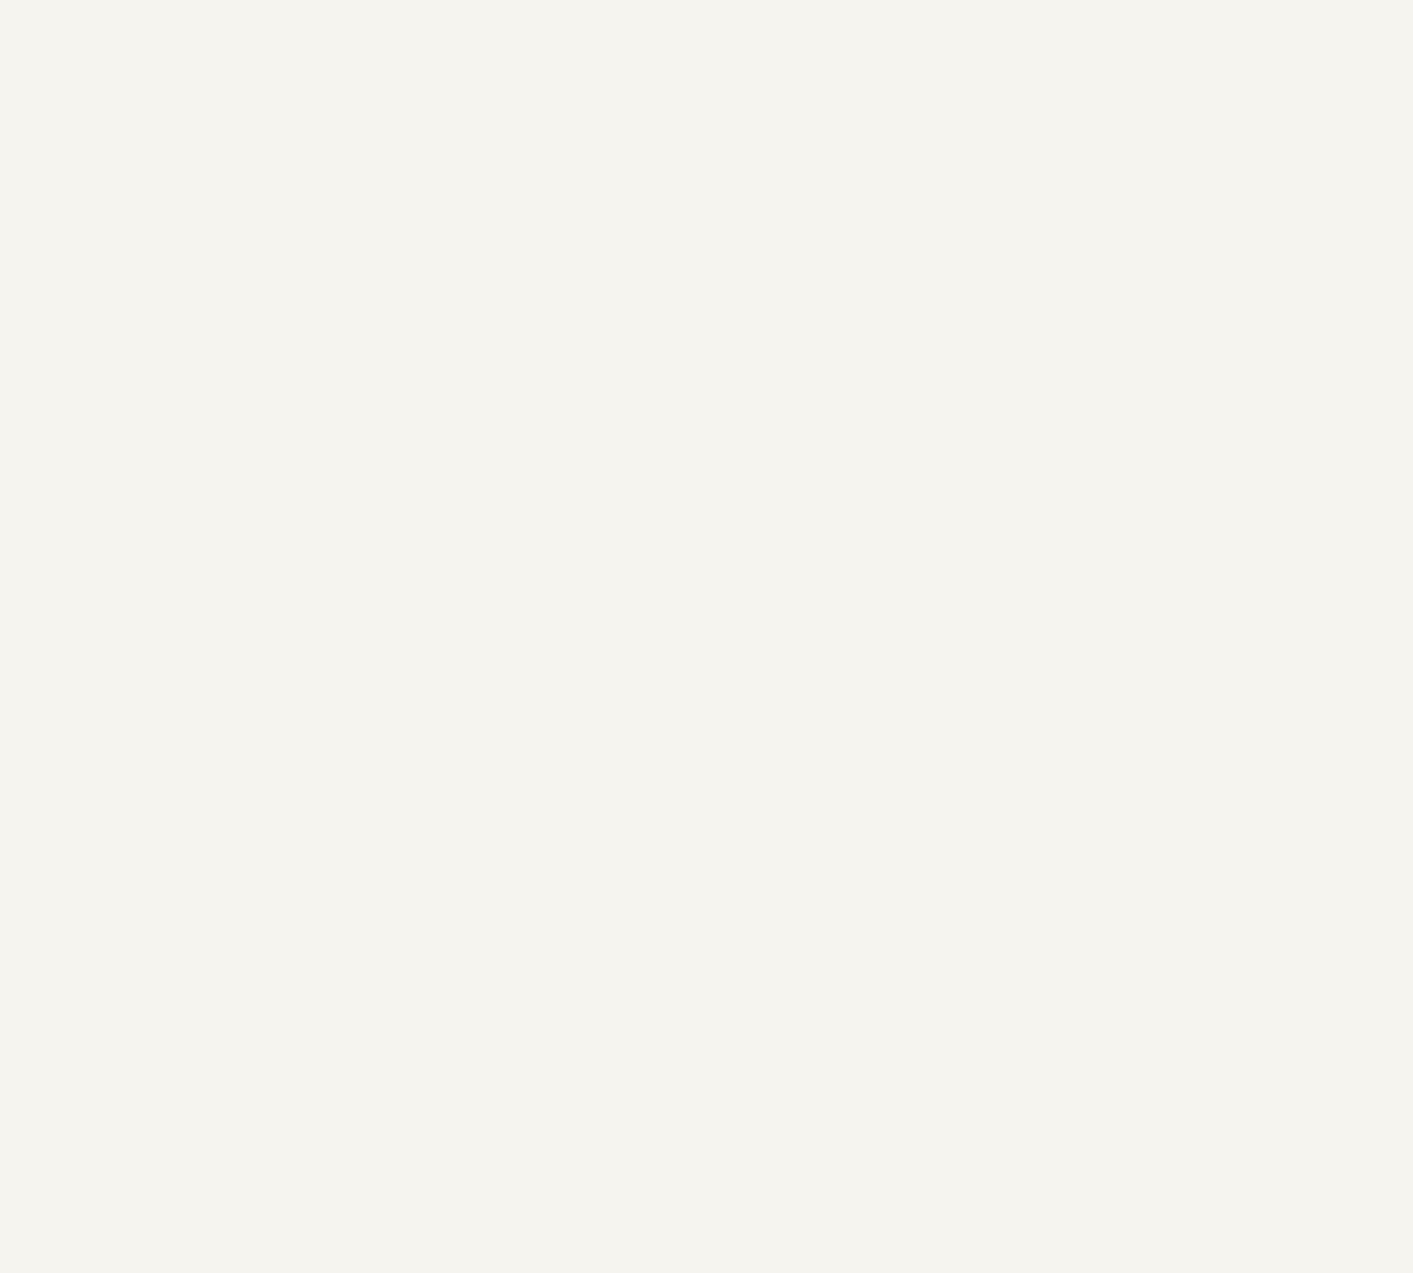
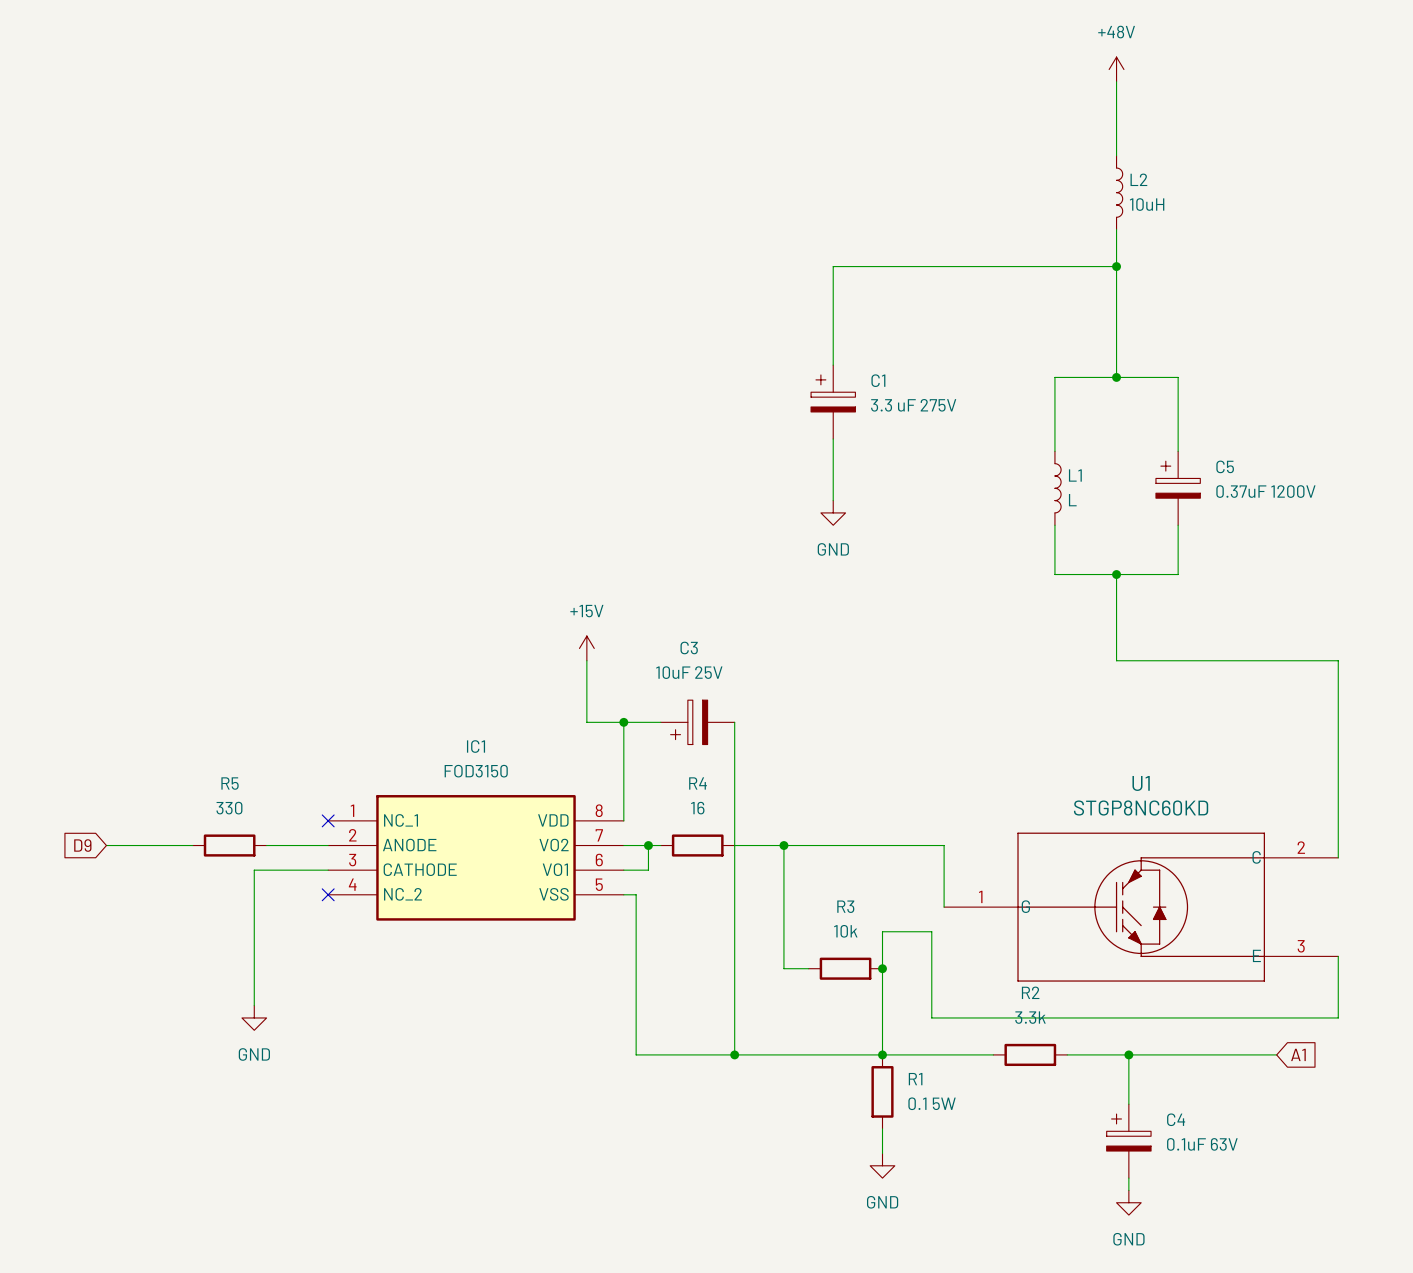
power symbol: none -> +48V (1116, 69)
wire: none -> (1116, 81) (1116, 155)
L2: none -> 10uH (1119, 192)
wire: none -> (1116, 229) (1116, 377)
wire: none -> (1116, 266) (833, 266) (833, 365)
junction: none -> (1116, 266)
junction: none -> (1116, 377)
C1: none -> 3.3 uF 275V (833, 402)
wire: none -> (833, 439) (833, 500)
wire: none -> (1054, 451) (1054, 377) (1178, 377) (1178, 451)
L1: none -> L (1058, 488)
C5: none -> 0.37uF 1200V (1178, 488)
power symbol: none -> GND (833, 512)
wire: none -> (1054, 525) (1054, 574) (1178, 574) (1178, 525)
wire: none -> (1116, 574) (1116, 660) (1338, 660) (1338, 857)
junction: none -> (1116, 574)
power symbol: none -> +15V (586, 648)
wire: none -> (586, 660) (586, 722) (660, 722)
wire: none -> (623, 722) (623, 820)
junction: none -> (623, 722)
C3: none -> 10uF 25V (697, 722)
wire: none -> (734, 722) (734, 1054)
no-connect mark: none -> (328, 820)
global label: none -> D9 (82, 845)
wire: none -> (106, 845) (192, 845)
R5: none -> 330 (229, 845)
wire: none -> (266, 845) (328, 845)
wire: none -> (623, 845) (660, 845)
wire: none -> (648, 845) (648, 870) (623, 870)
junction: none -> (648, 845)
R4: none -> 16 (697, 845)
wire: none -> (734, 845) (944, 845) (944, 907)
wire: none -> (783, 845) (783, 968) (808, 968)
junction: none -> (783, 845)
IC1: none -> FOD3150 (476, 857)
wire: none -> (328, 870) (254, 870) (254, 1005)
no-connect mark: none -> (328, 894)
wire: none -> (623, 894) (636, 894) (636, 1054) (993, 1054)
U1: none -> STGP8NC60KD (1141, 907)
wire: none -> (1338, 956) (1338, 1017) (931, 1017) (931, 931) (882, 931) (882, 1054)
R3: none -> 10k (845, 968)
junction: none -> (882, 968)
power symbol: none -> GND (254, 1017)
junction: none -> (734, 1054)
junction: none -> (882, 1054)
R2: none -> 3.3k (1030, 1054)
wire: none -> (1067, 1054) (1276, 1054)
wire: none -> (1128, 1054) (1128, 1104)
junction: none -> (1128, 1054)
global label: none -> A1 (1298, 1054)
R1: none -> 0.1 5W (882, 1091)
wire: none -> (882, 1128) (882, 1153)
C4: none -> 0.1uF 63V (1128, 1141)
power symbol: none -> GND (882, 1165)
wire: none -> (1128, 1178) (1128, 1190)
power symbol: none -> GND (1128, 1202)

